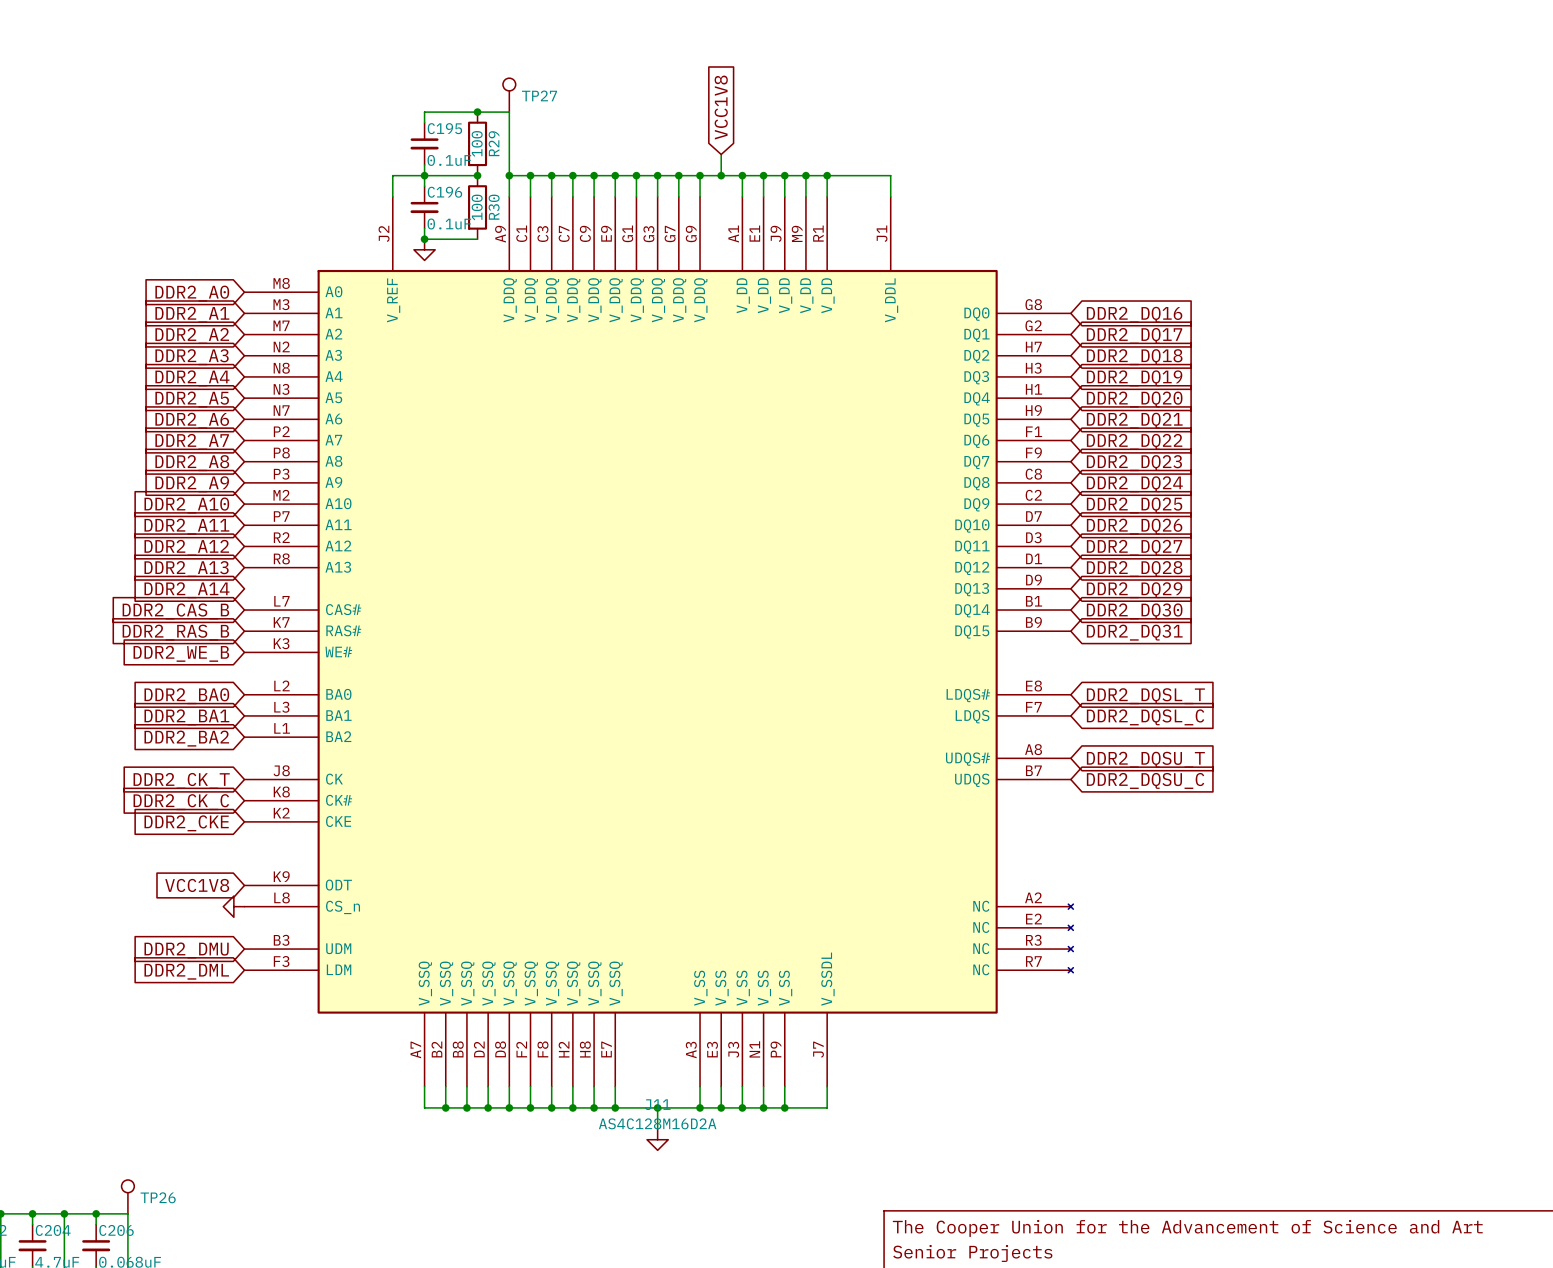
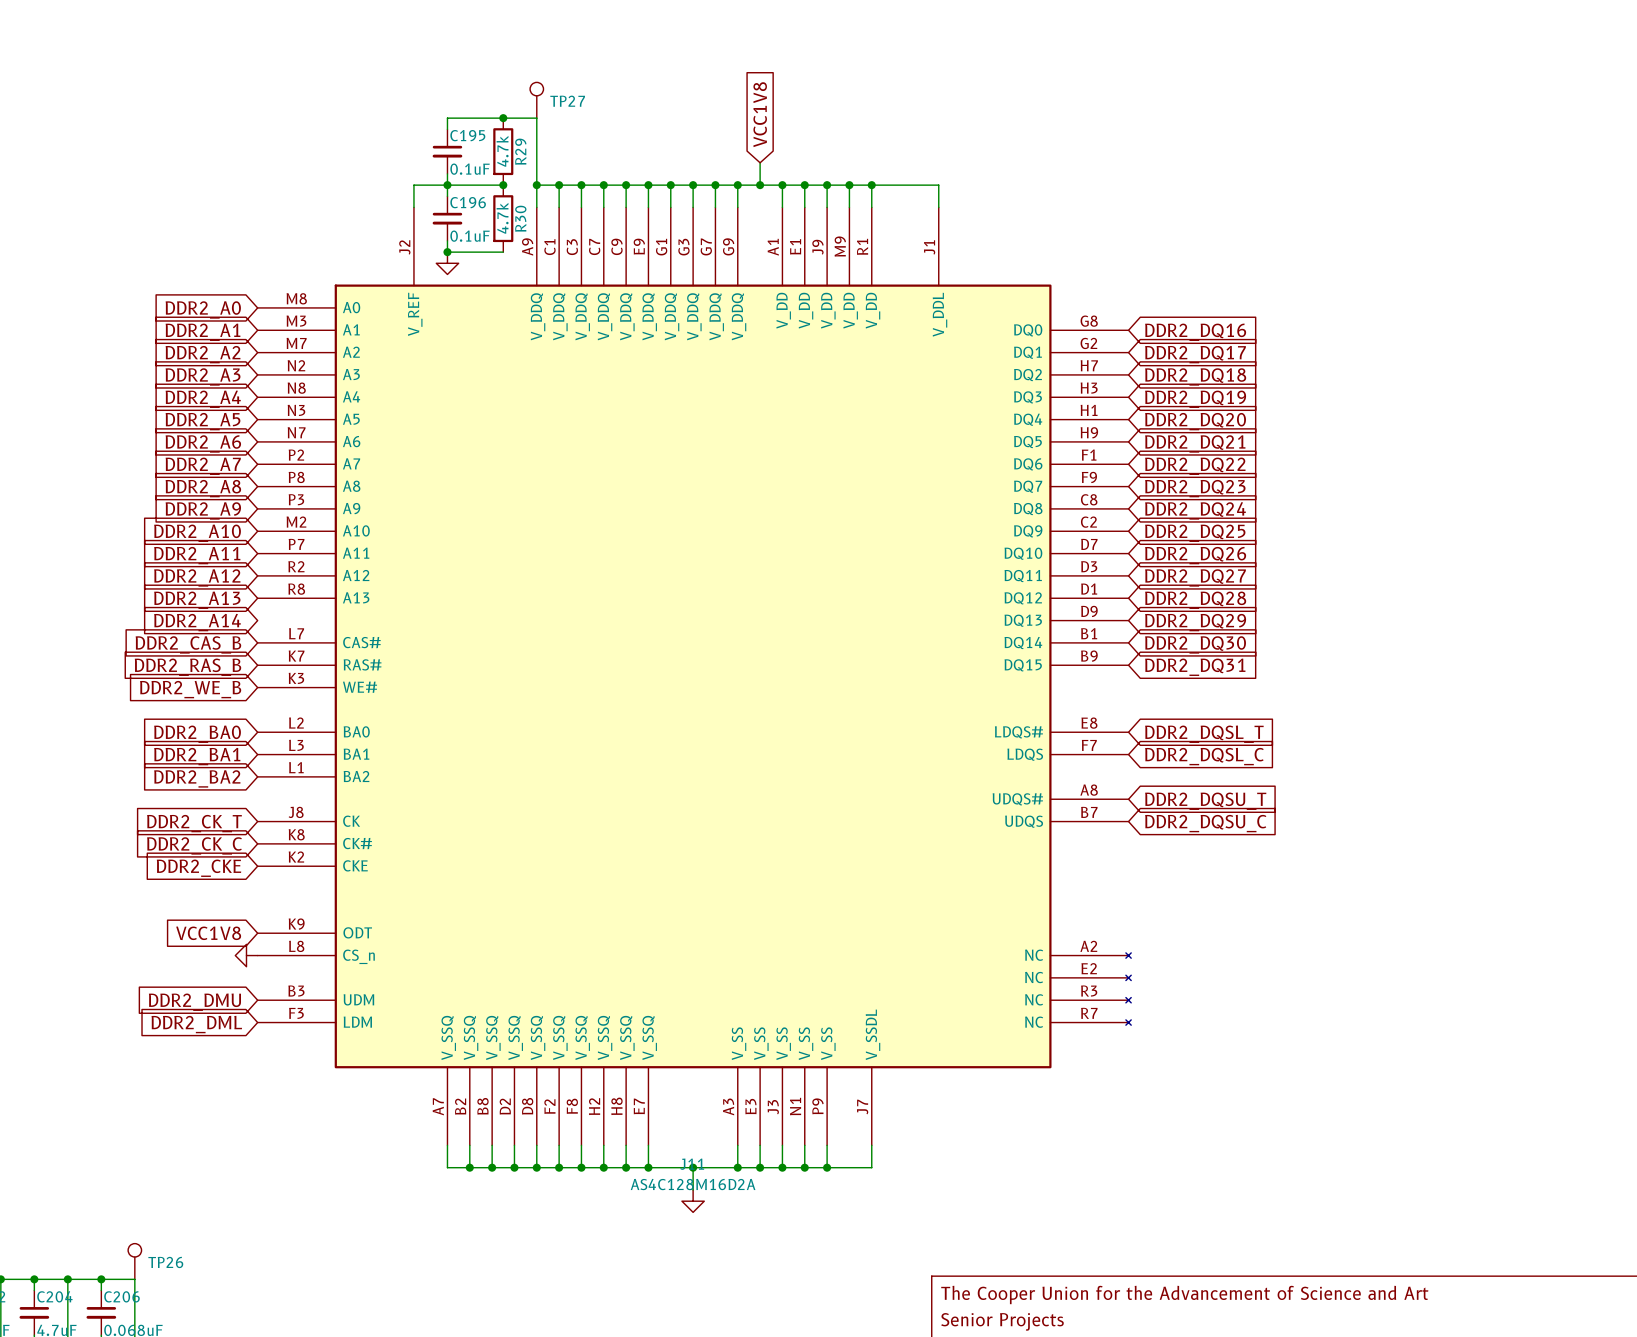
R29 value: 100 (477, 143) -> 4.7k (502, 151)
R30 value: 100 (477, 207) -> 4.7k (502, 218)

